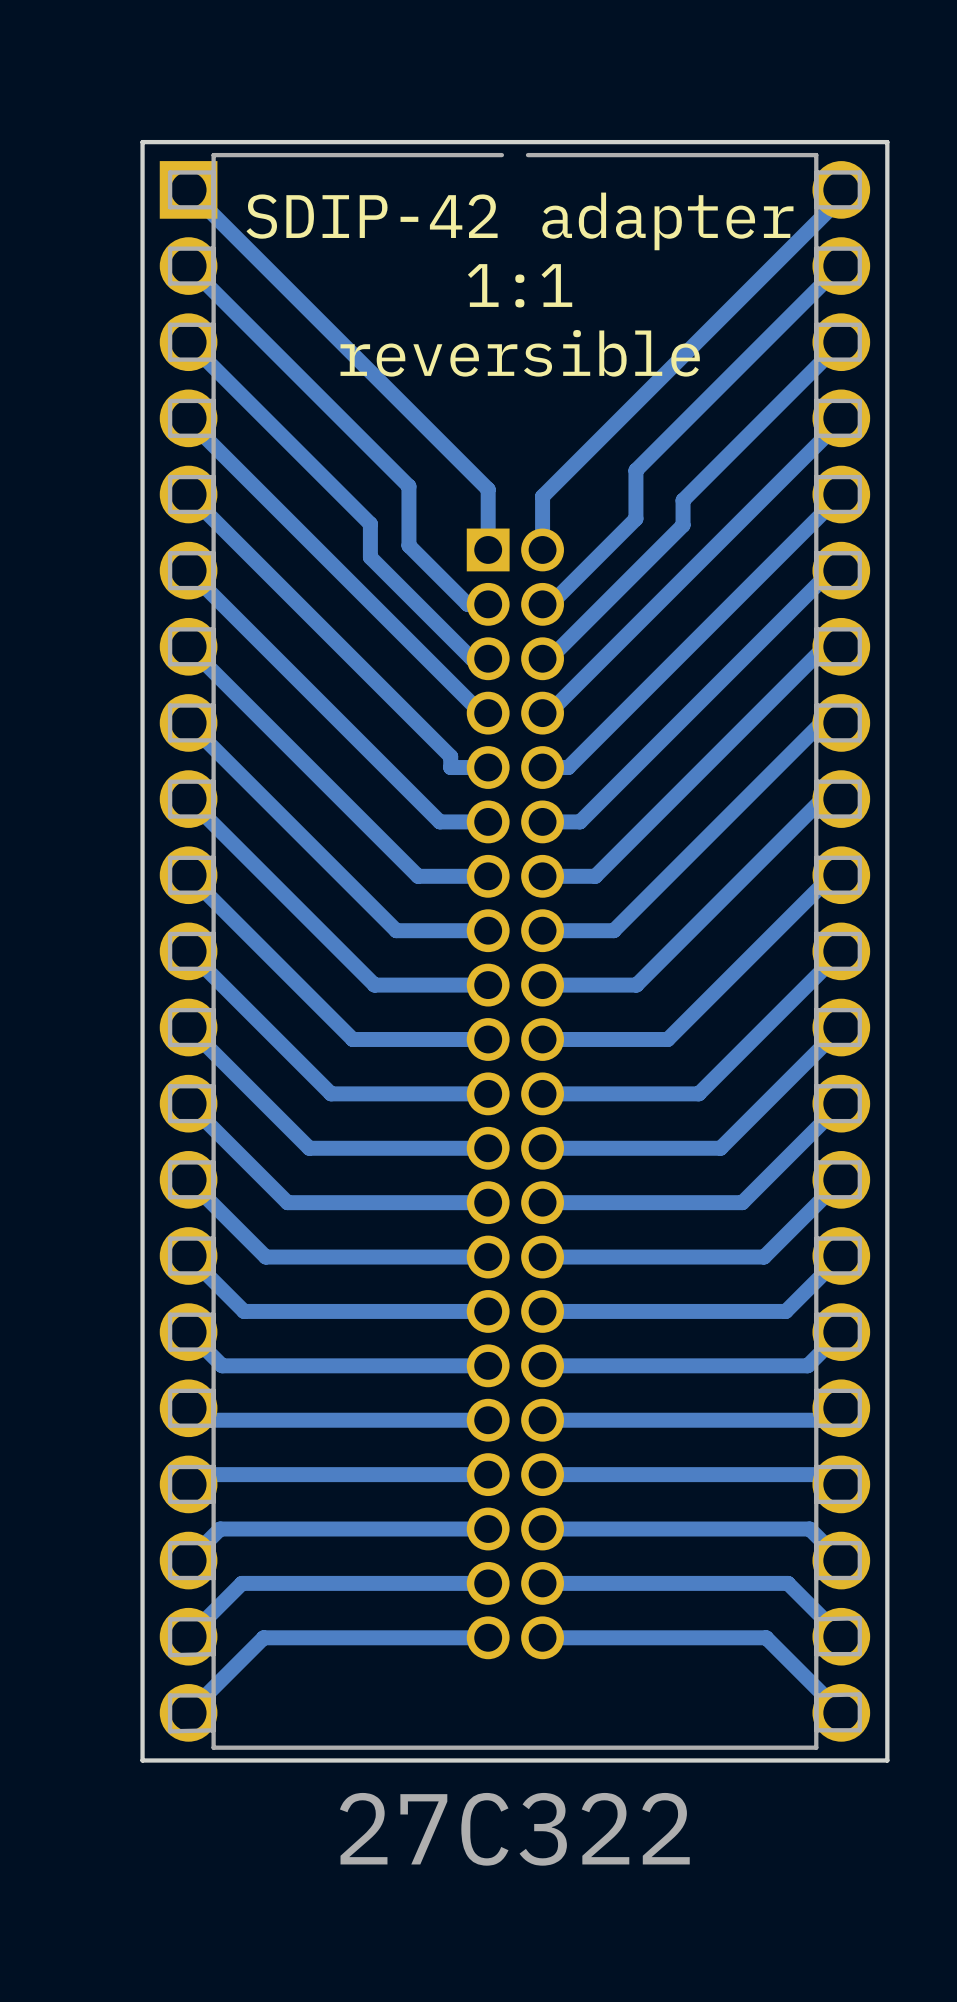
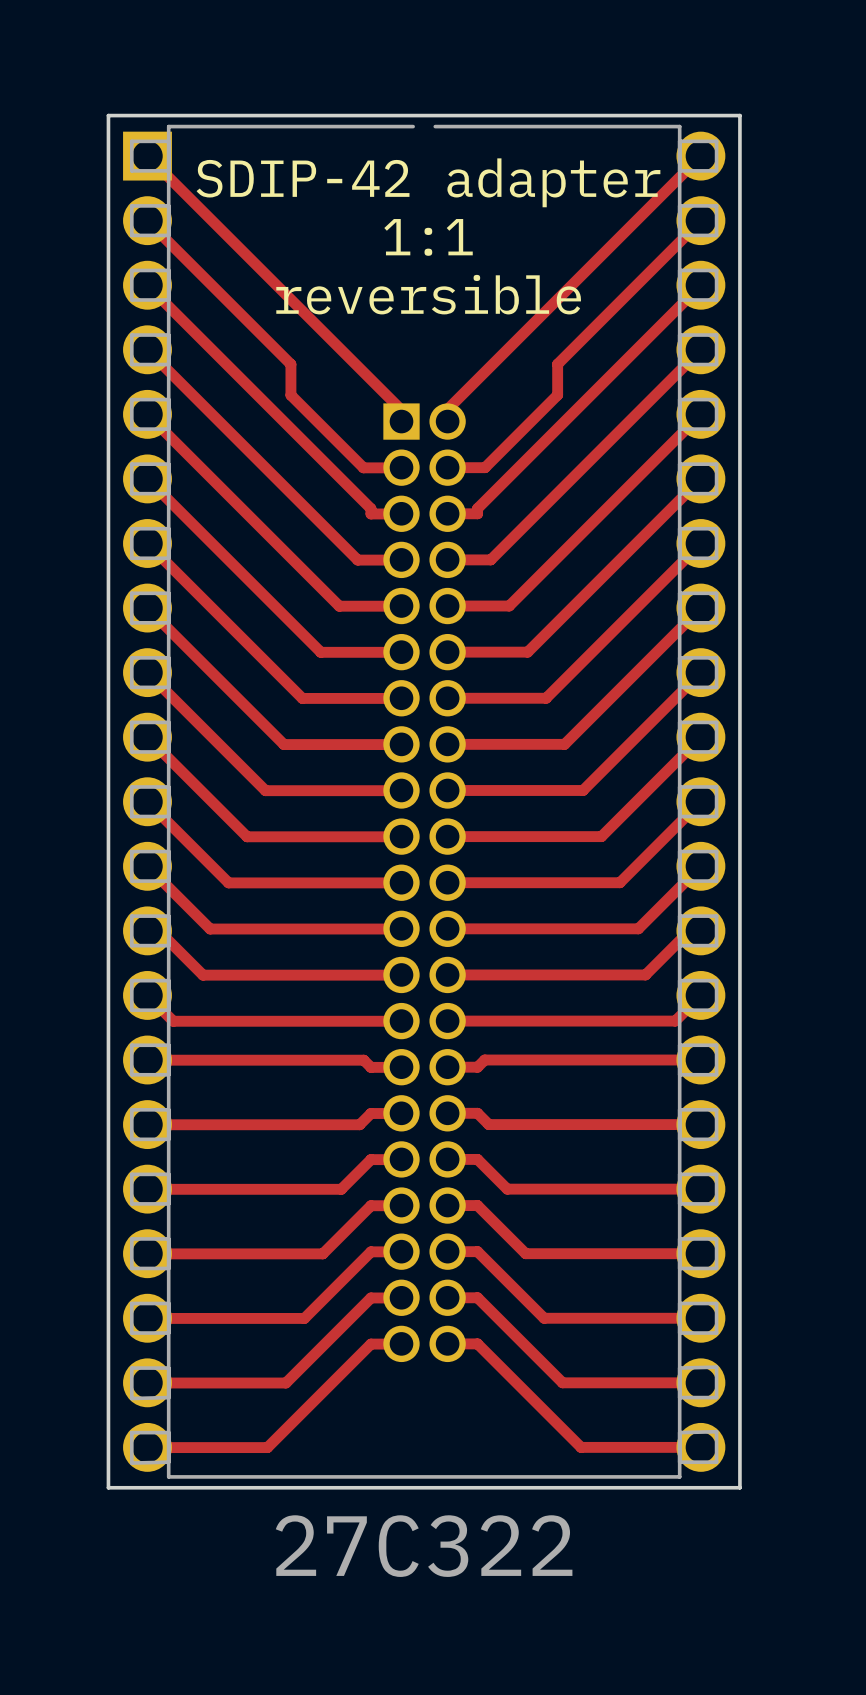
bottom track: (188, 189) (488, 489) (488, 549) -> none
bottom track: (841, 189) (841, 197) (542, 496) (542, 549) -> none
top track: none -> (700, 156) (447, 409) (447, 421)
top track: none -> (147, 156) (400, 409) (400, 421)
bottom track: (188, 266) (408, 486) (408, 545) (467, 604) (488, 604) -> none
top track: none -> (147, 221) (290, 364) (290, 395) (363, 467) (400, 467)
bottom track: (841, 266) (635, 470) (635, 518) (550, 604) (542, 604) -> none
top track: none -> (700, 220) (557, 364) (557, 395) (485, 467) (447, 467)
bottom track: (188, 342) (370, 524) (370, 557) (471, 658) (488, 658) -> none
top track: none -> (147, 285) (370, 508) (370, 513) (400, 513)
bottom track: (841, 342) (683, 500) (683, 525) (549, 658) (542, 658) -> none
top track: none -> (700, 285) (477, 508) (477, 513) (447, 513)
bottom track: (188, 418) (188, 420) (481, 713) (488, 713) -> none
top track: none -> (147, 349) (357, 560) (400, 560)
bottom track: (841, 418) (841, 420) (548, 713) (542, 713) -> none
top track: none -> (700, 349) (490, 559) (447, 559)
bottom track: (188, 494) (450, 756) (450, 767) (488, 767) -> none
top track: none -> (147, 414) (339, 606) (400, 606)
bottom track: (841, 494) (568, 767) (542, 767) -> none
top track: none -> (700, 414) (509, 606) (447, 606)
bottom track: (188, 570) (439, 821) (488, 821) -> none
top track: none -> (147, 479) (320, 652) (400, 652)
bottom track: (841, 570) (831, 570) (580, 821) (542, 821) -> none
top track: none -> (700, 478) (527, 652) (447, 652)
bottom track: (188, 646) (418, 876) (488, 876) -> none
bottom track: (841, 646) (824, 646) (595, 876) (542, 876) -> none
top track: none -> (700, 543) (546, 698) (447, 698)
top track: none -> (147, 543) (302, 698) (400, 698)
bottom track: (188, 722) (396, 930) (488, 930) -> none
bottom track: (841, 722) (821, 722) (613, 930) (542, 930) -> none
top track: none -> (700, 608) (564, 744) (447, 744)
top track: none -> (147, 608) (283, 744) (400, 744)
bottom track: (188, 799) (374, 985) (488, 985) -> none
top track: none -> (147, 672) (265, 790) (400, 790)
bottom track: (841, 799) (822, 799) (636, 985) (542, 985) -> none
top track: none -> (700, 672) (583, 790) (447, 790)
bottom track: (188, 875) (352, 1039) (488, 1039) -> none
top track: none -> (147, 737) (247, 836) (400, 836)
bottom track: (841, 875) (832, 875) (667, 1039) (542, 1039) -> none
top track: none -> (700, 737) (601, 836) (447, 836)
bottom track: (188, 951) (331, 1093) (488, 1093) -> none
top track: none -> (147, 801) (228, 882) (400, 882)
bottom track: (841, 951) (698, 1093) (542, 1093) -> none
top track: none -> (700, 801) (619, 882) (447, 882)
bottom track: (188, 1027) (309, 1148) (488, 1148) -> none
top track: none -> (147, 866) (210, 929) (400, 929)
bottom track: (841, 1027) (720, 1148) (542, 1148) -> none
top track: none -> (700, 866) (638, 928) (447, 928)
part position: (515, 1093) -> (424, 882)
bottom track: (188, 1103) (287, 1202) (488, 1202) -> none
top track: none -> (147, 931) (158, 931) (203, 975) (400, 975)
bottom track: (841, 1103) (742, 1202) (542, 1202) -> none
top track: none -> (700, 930) (689, 930) (645, 974) (447, 974)
bottom track: (188, 1179) (265, 1257) (488, 1257) -> none
bottom track: (841, 1179) (764, 1257) (542, 1257) -> none
top track: none -> (700, 995) (675, 1021) (447, 1021)
top track: none -> (147, 995) (173, 1021) (400, 1021)
bottom track: (188, 1255) (244, 1311) (488, 1311) -> none
bottom track: (841, 1255) (785, 1311) (542, 1311) -> none
top track: none -> (700, 1060) (484, 1060) (477, 1067) (447, 1067)
top track: none -> (147, 1060) (363, 1060) (370, 1067) (400, 1067)
top track: none -> (447, 1113) (477, 1113) (488, 1124) (700, 1124)
top track: none -> (400, 1113) (370, 1113) (359, 1124) (147, 1124)
bottom track: (188, 1332) (222, 1365) (488, 1365) -> none
bottom track: (841, 1332) (807, 1365) (542, 1365) -> none
top track: none -> (400, 1159) (370, 1159) (341, 1189) (147, 1189)
top track: none -> (447, 1159) (477, 1159) (507, 1189) (700, 1189)
bottom track: (188, 1408) (200, 1420) (488, 1420) -> none
bottom track: (841, 1408) (829, 1420) (542, 1420) -> none
top track: none -> (400, 1205) (370, 1205) (322, 1253) (147, 1253)
top track: none -> (447, 1205) (477, 1205) (525, 1253) (700, 1253)
bottom track: (488, 1474) (198, 1474) (188, 1484) -> none
bottom track: (542, 1474) (831, 1474) (841, 1484) -> none
top track: none -> (400, 1251) (370, 1251) (304, 1318) (147, 1318)
top track: none -> (447, 1251) (477, 1251) (544, 1318) (700, 1318)
bottom track: (488, 1529) (220, 1529) (188, 1560) -> none
bottom track: (542, 1529) (809, 1529) (841, 1560) -> none
top track: none -> (400, 1297) (370, 1297) (285, 1383) (147, 1383)
top track: none -> (447, 1297) (477, 1297) (562, 1382) (700, 1382)
bottom track: (488, 1583) (241, 1583) (188, 1636) -> none
bottom track: (542, 1583) (787, 1583) (841, 1636) -> none
top track: none -> (447, 1343) (477, 1343) (581, 1447) (700, 1447)
top track: none -> (400, 1344) (370, 1344) (267, 1447) (147, 1447)
bottom track: (488, 1637) (263, 1637) (188, 1712) -> none
bottom track: (542, 1637) (766, 1637) (841, 1712) -> none

